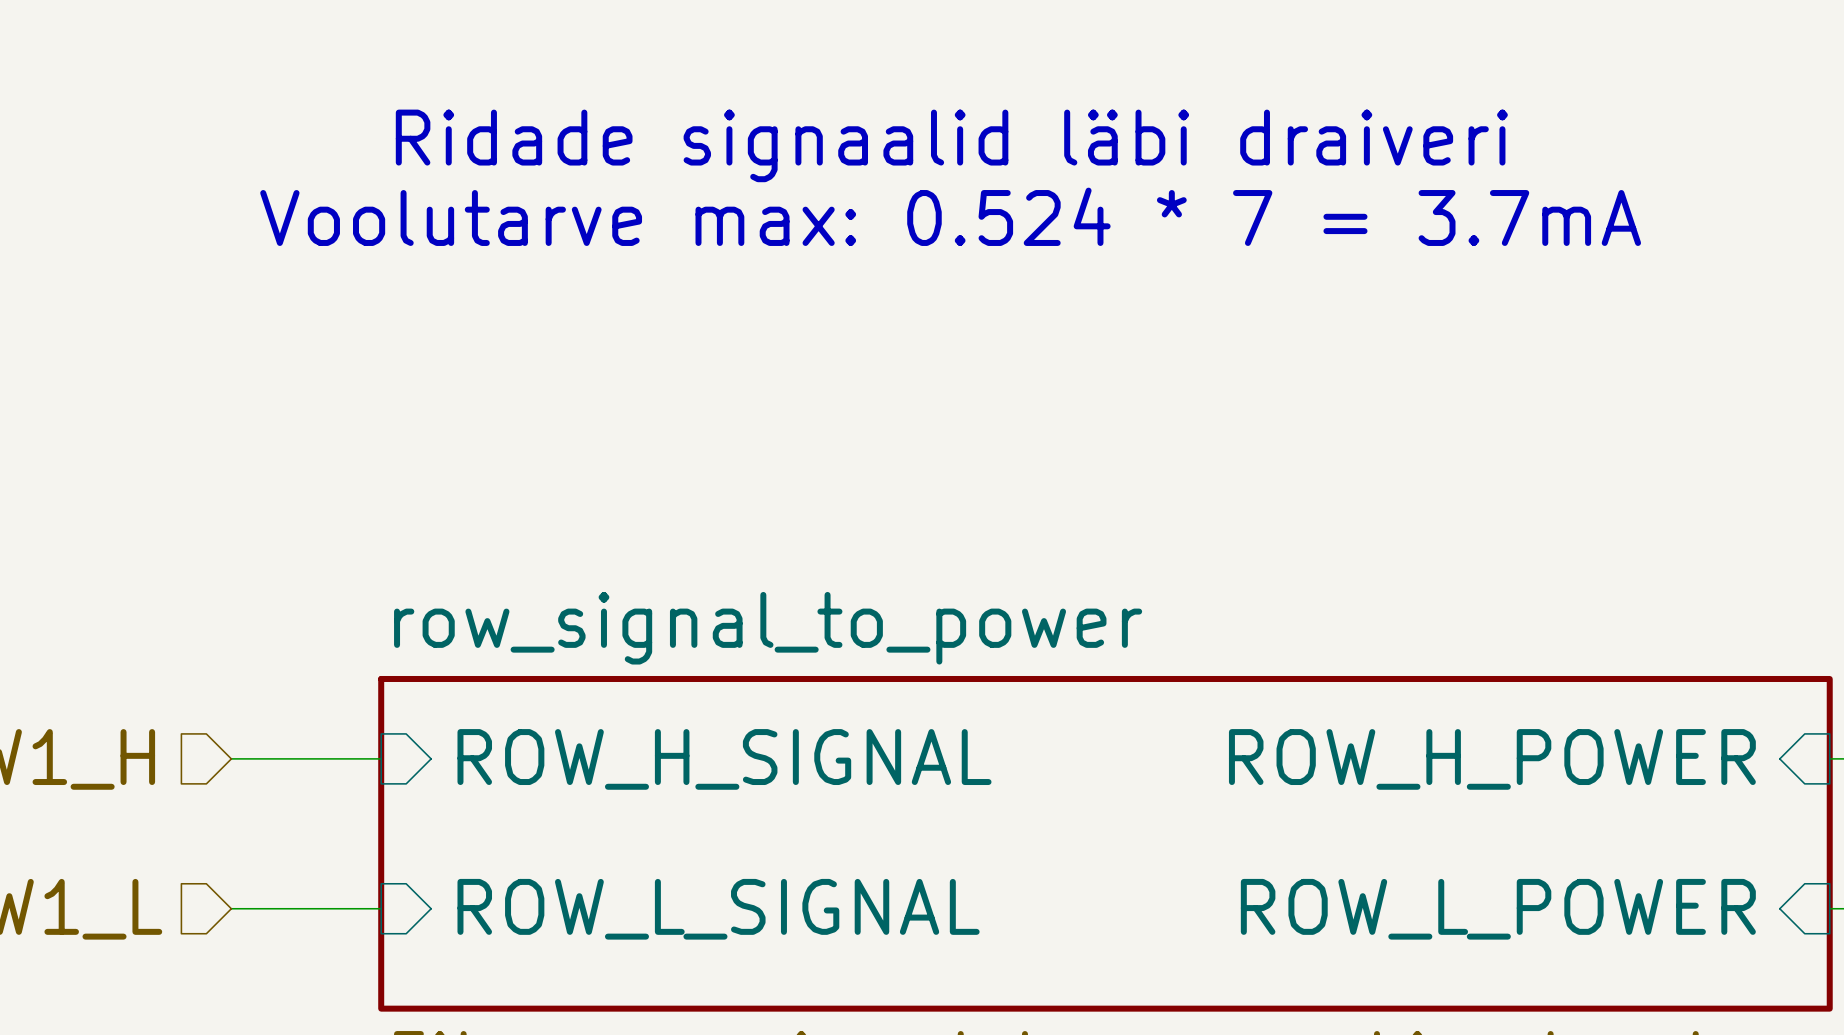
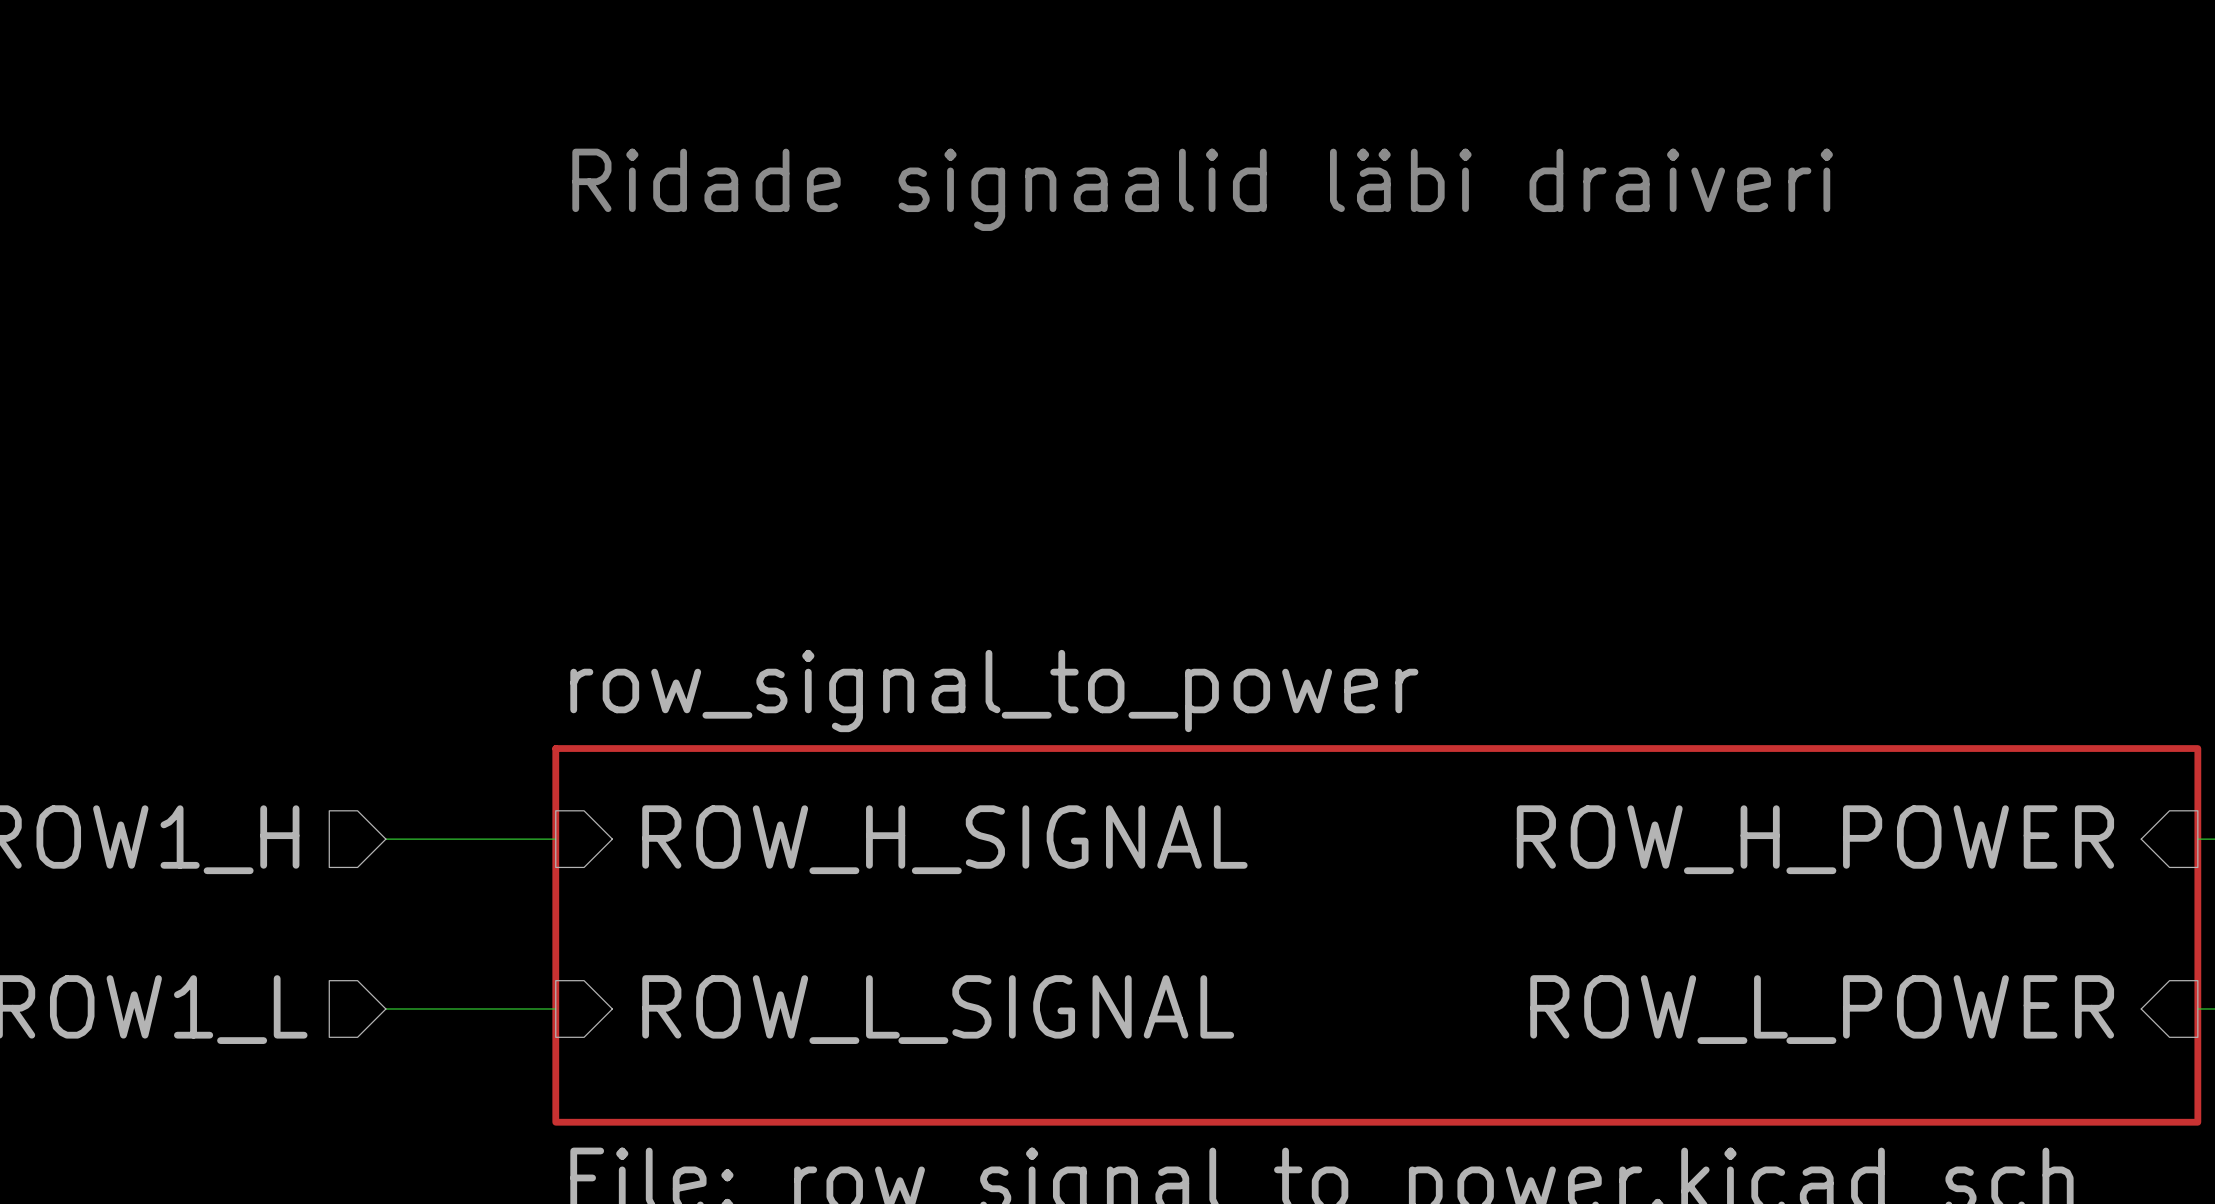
text position: Ridade signaalid läbi draiveri (951, 145) -> Ridade signaalid läbi draiveri (1202, 189)
text: Voolutarve max: 0.524 * 7 = 3.7mA (950, 216) -> none

